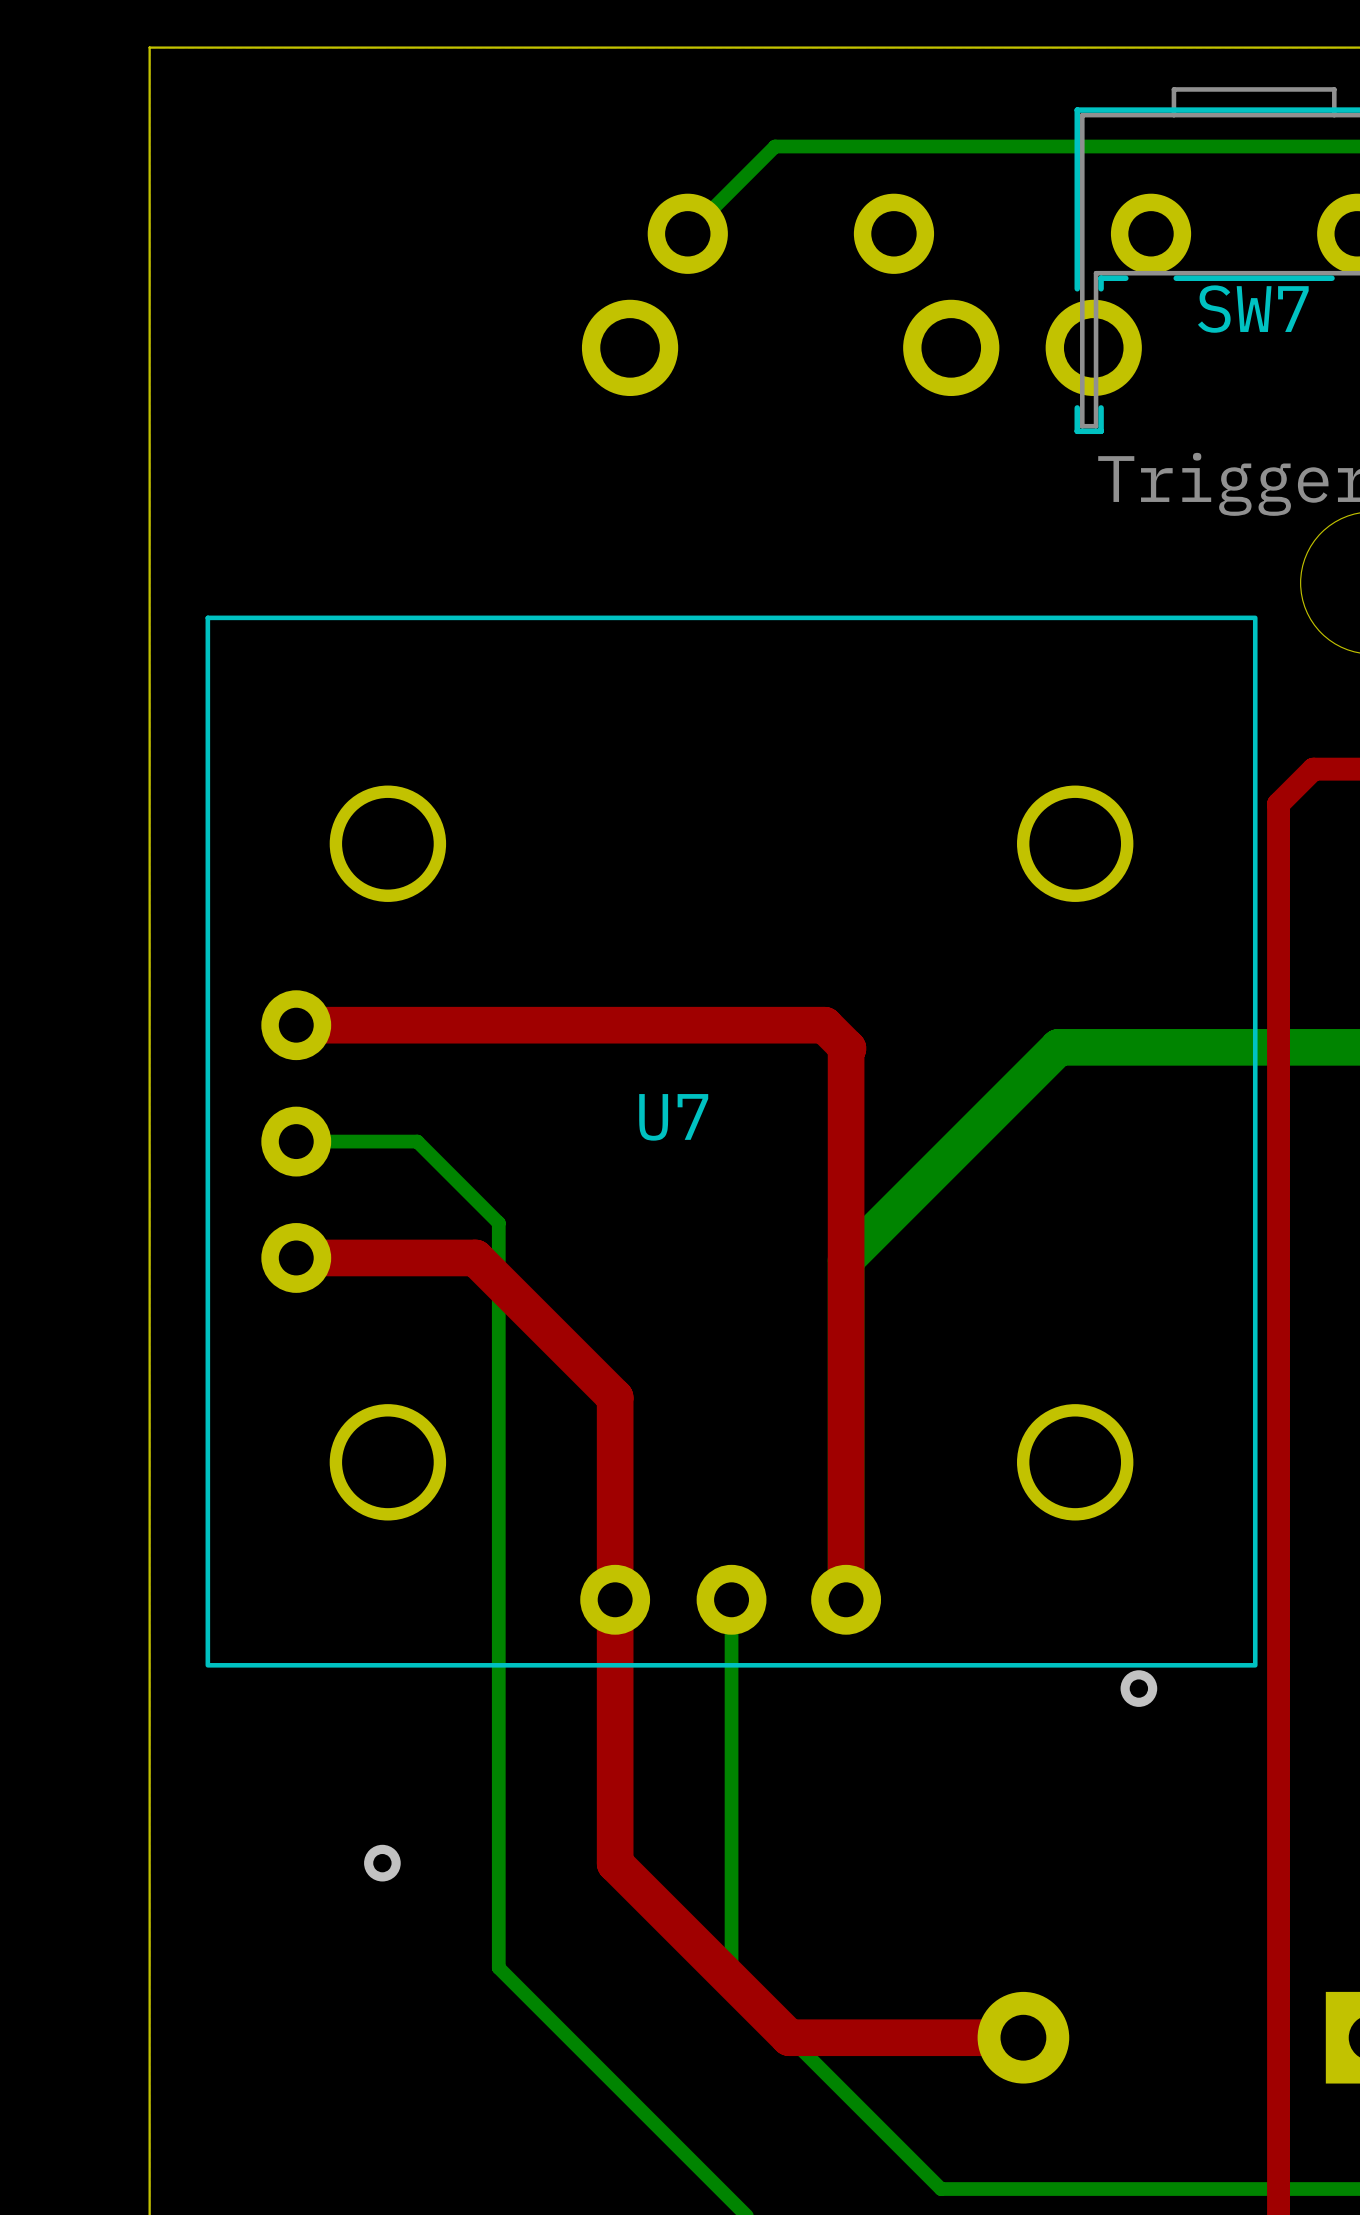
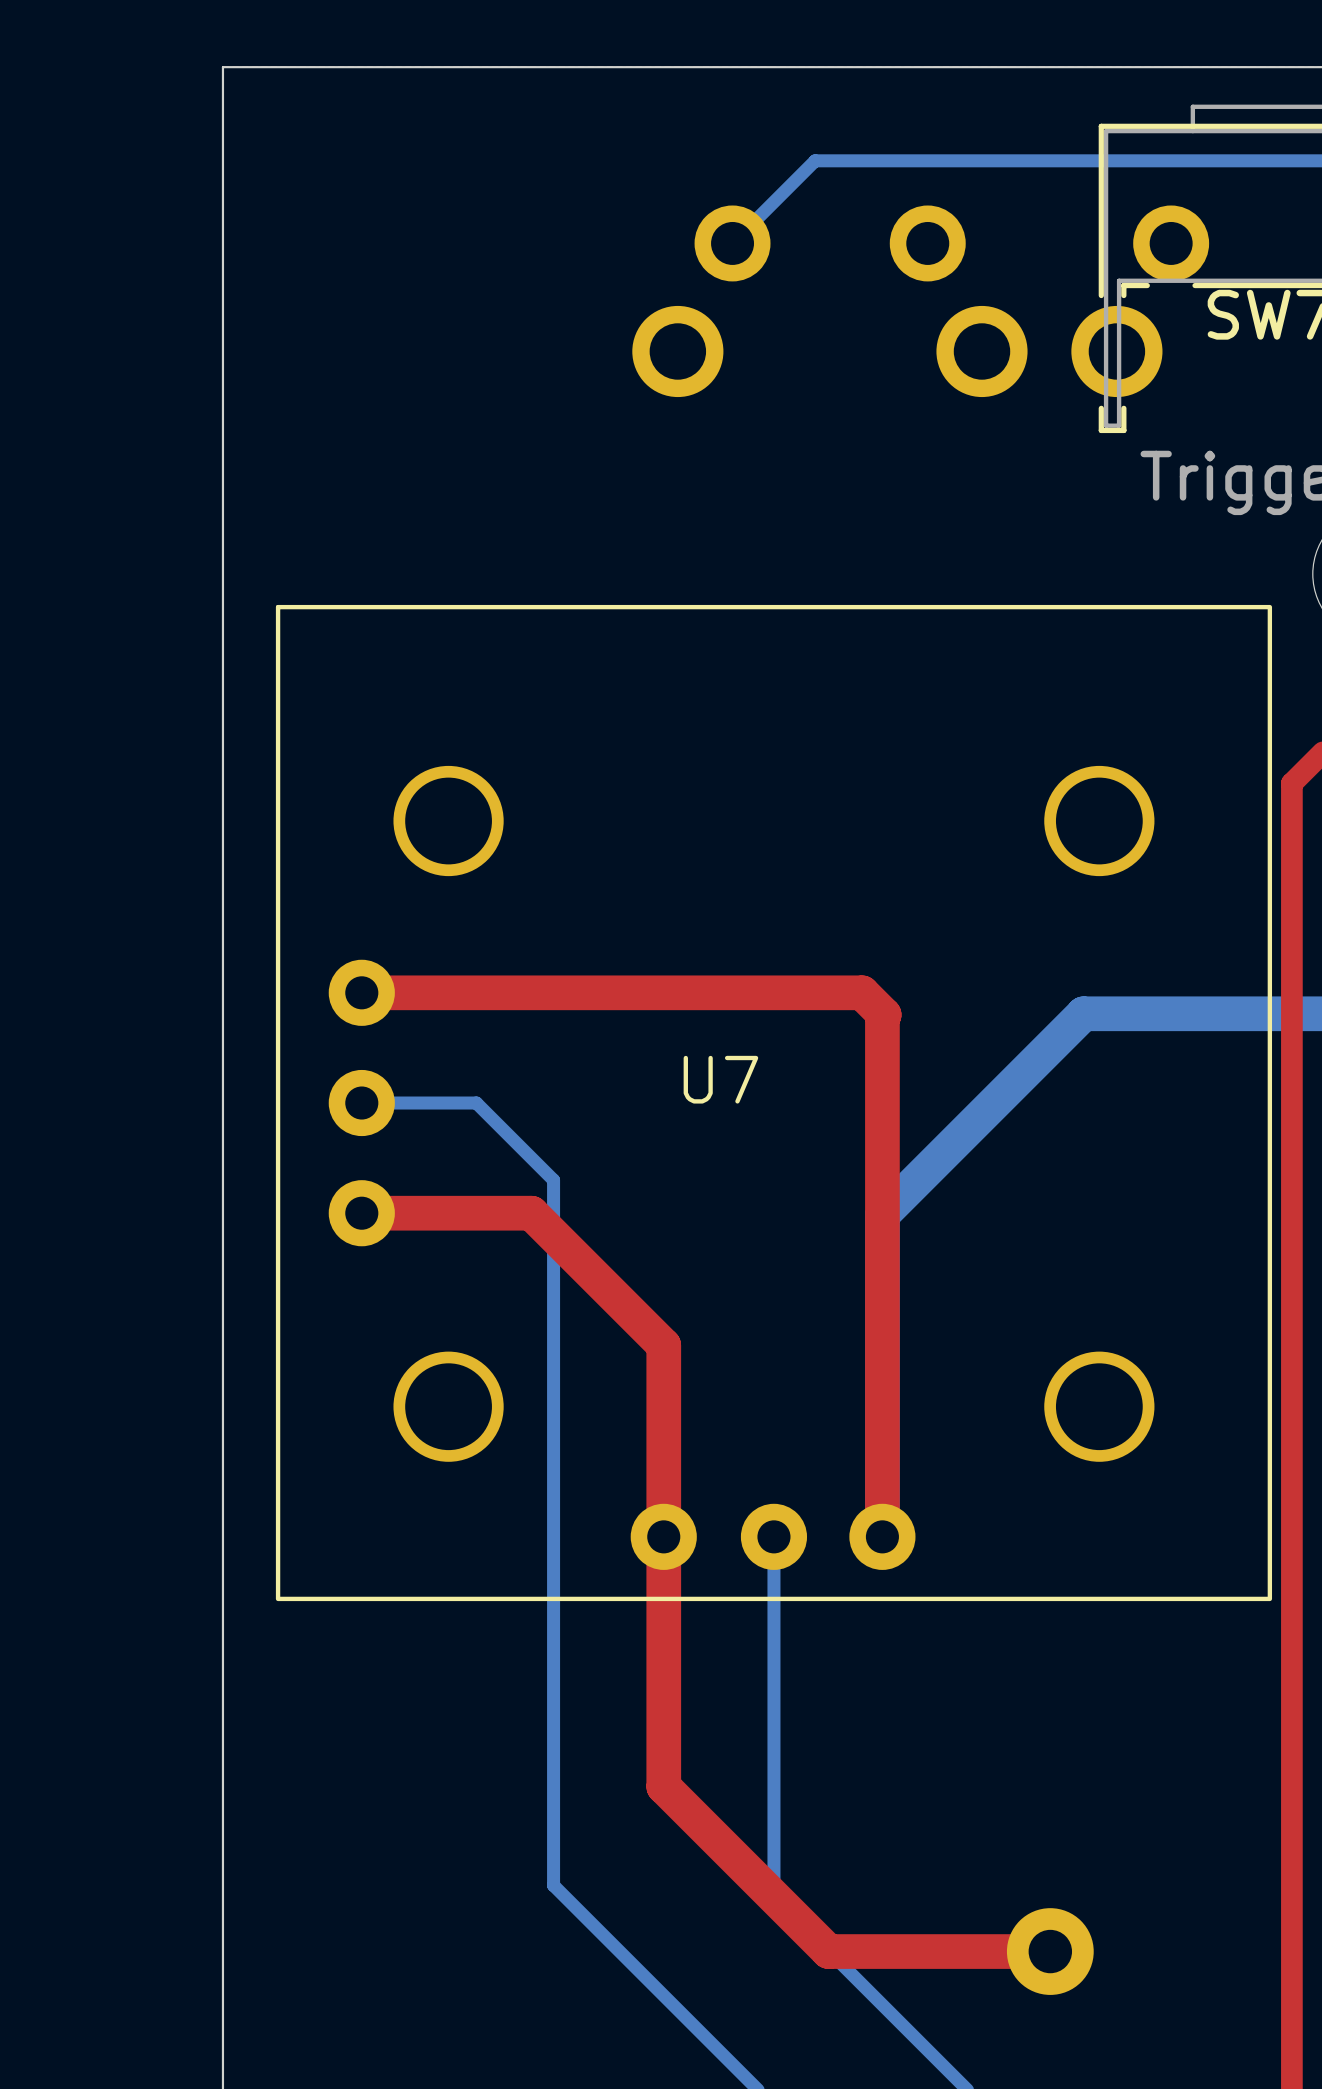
via: (1138, 1688) -> none
via: (382, 1863) -> none

